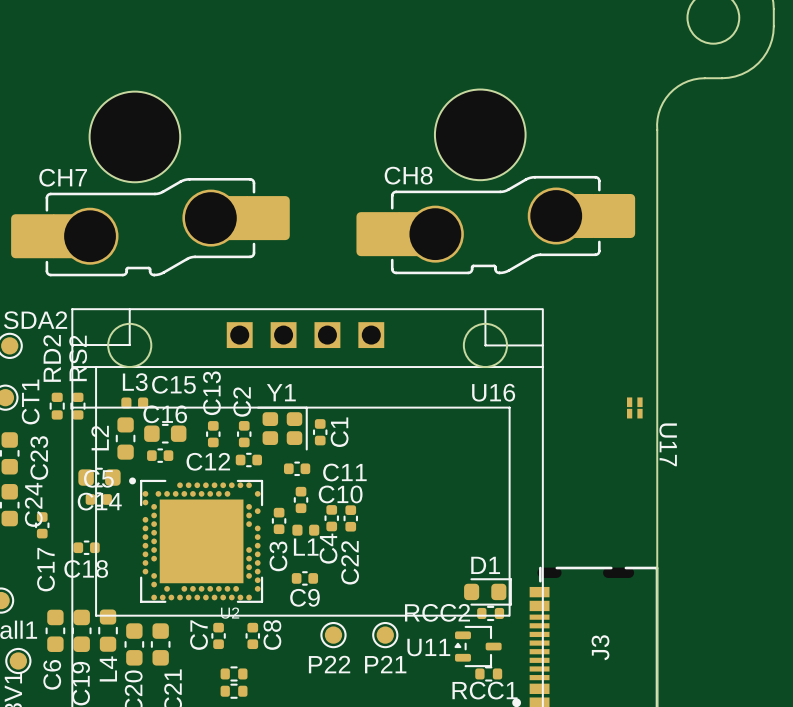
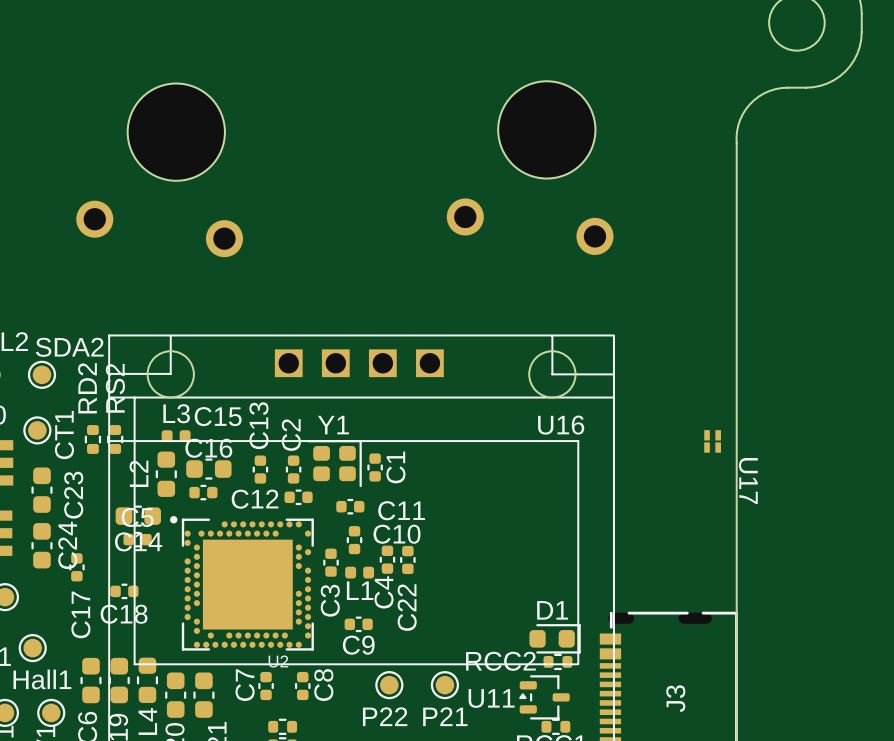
part: none -> (530, 168)
part: none -> (159, 170)
CH8: (495, 181) -> none
CH7: (150, 183) -> none

